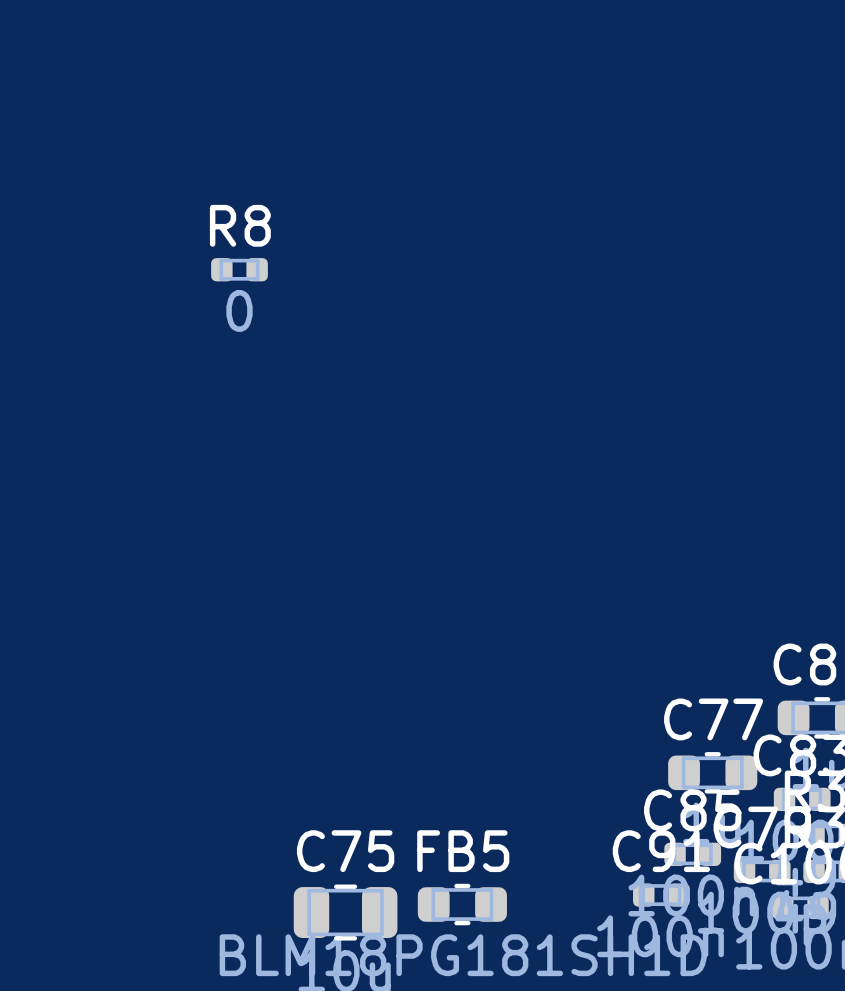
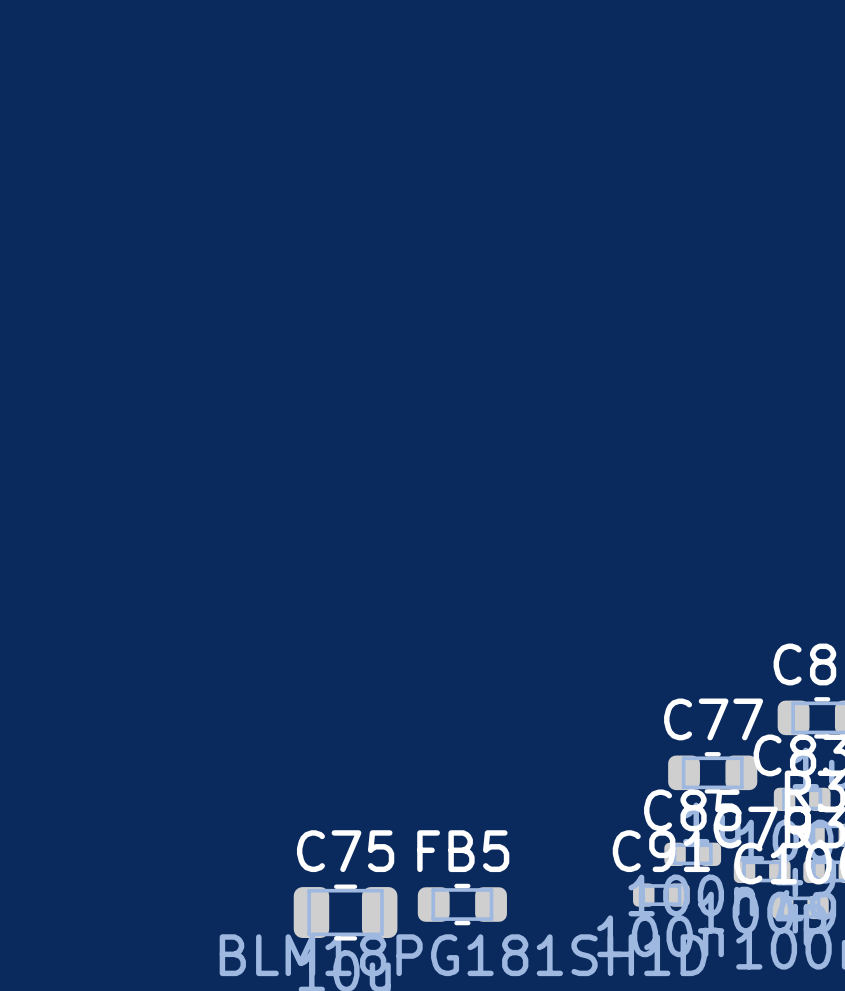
R8: 0 (239, 269) -> none

